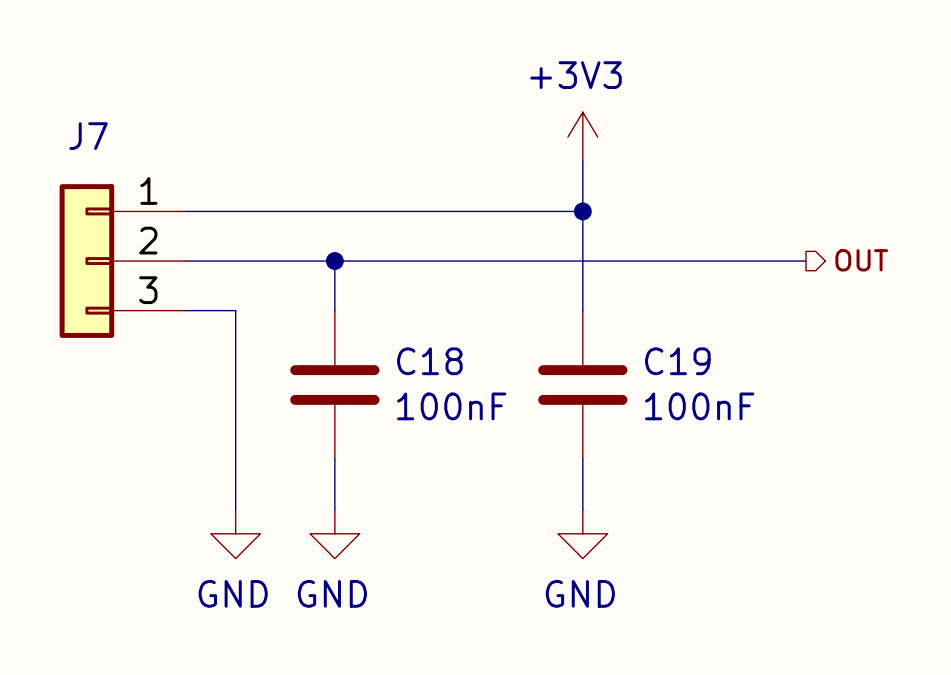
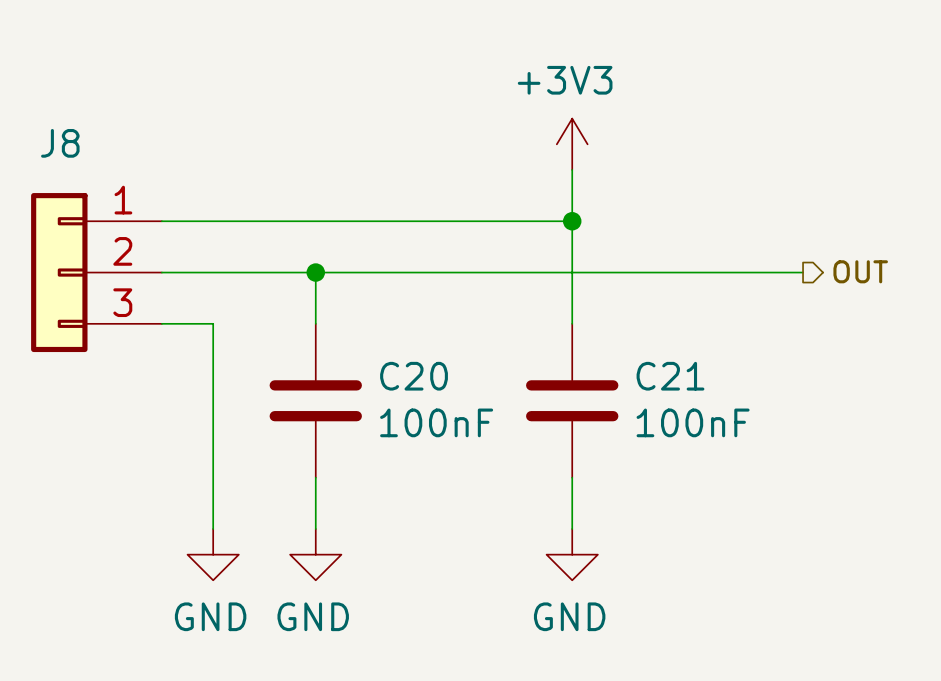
J7 name: J7 (88, 136) -> J8 (60, 143)
C18 name: C18 (429, 361) -> C20 (414, 376)
C19 name: C19 (677, 361) -> C21 (670, 376)

